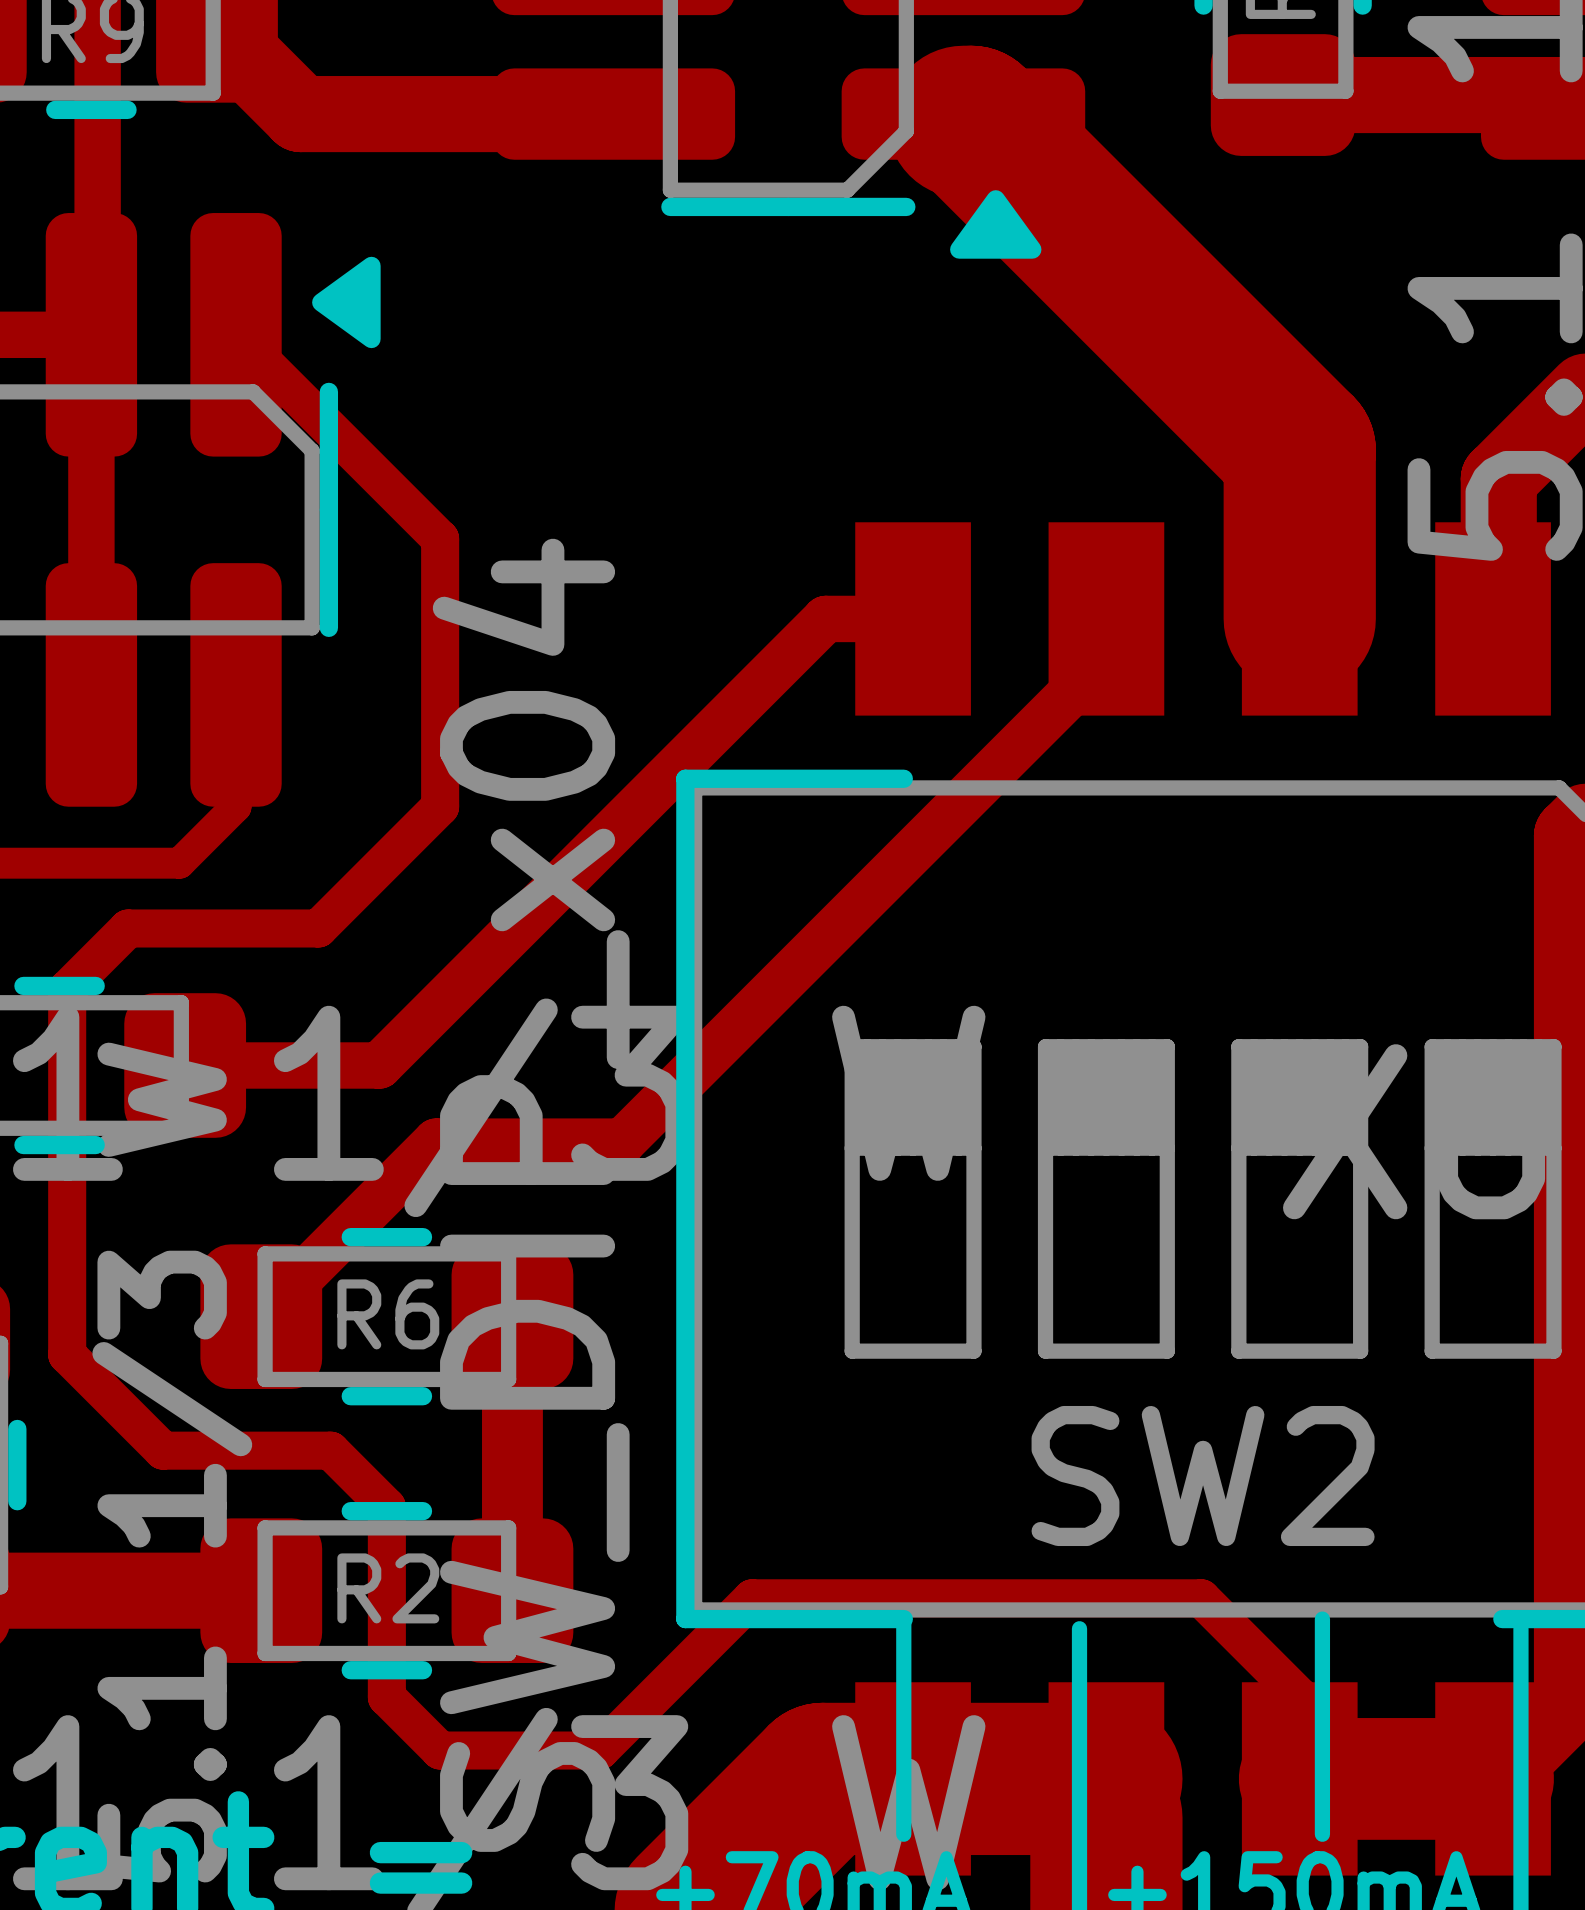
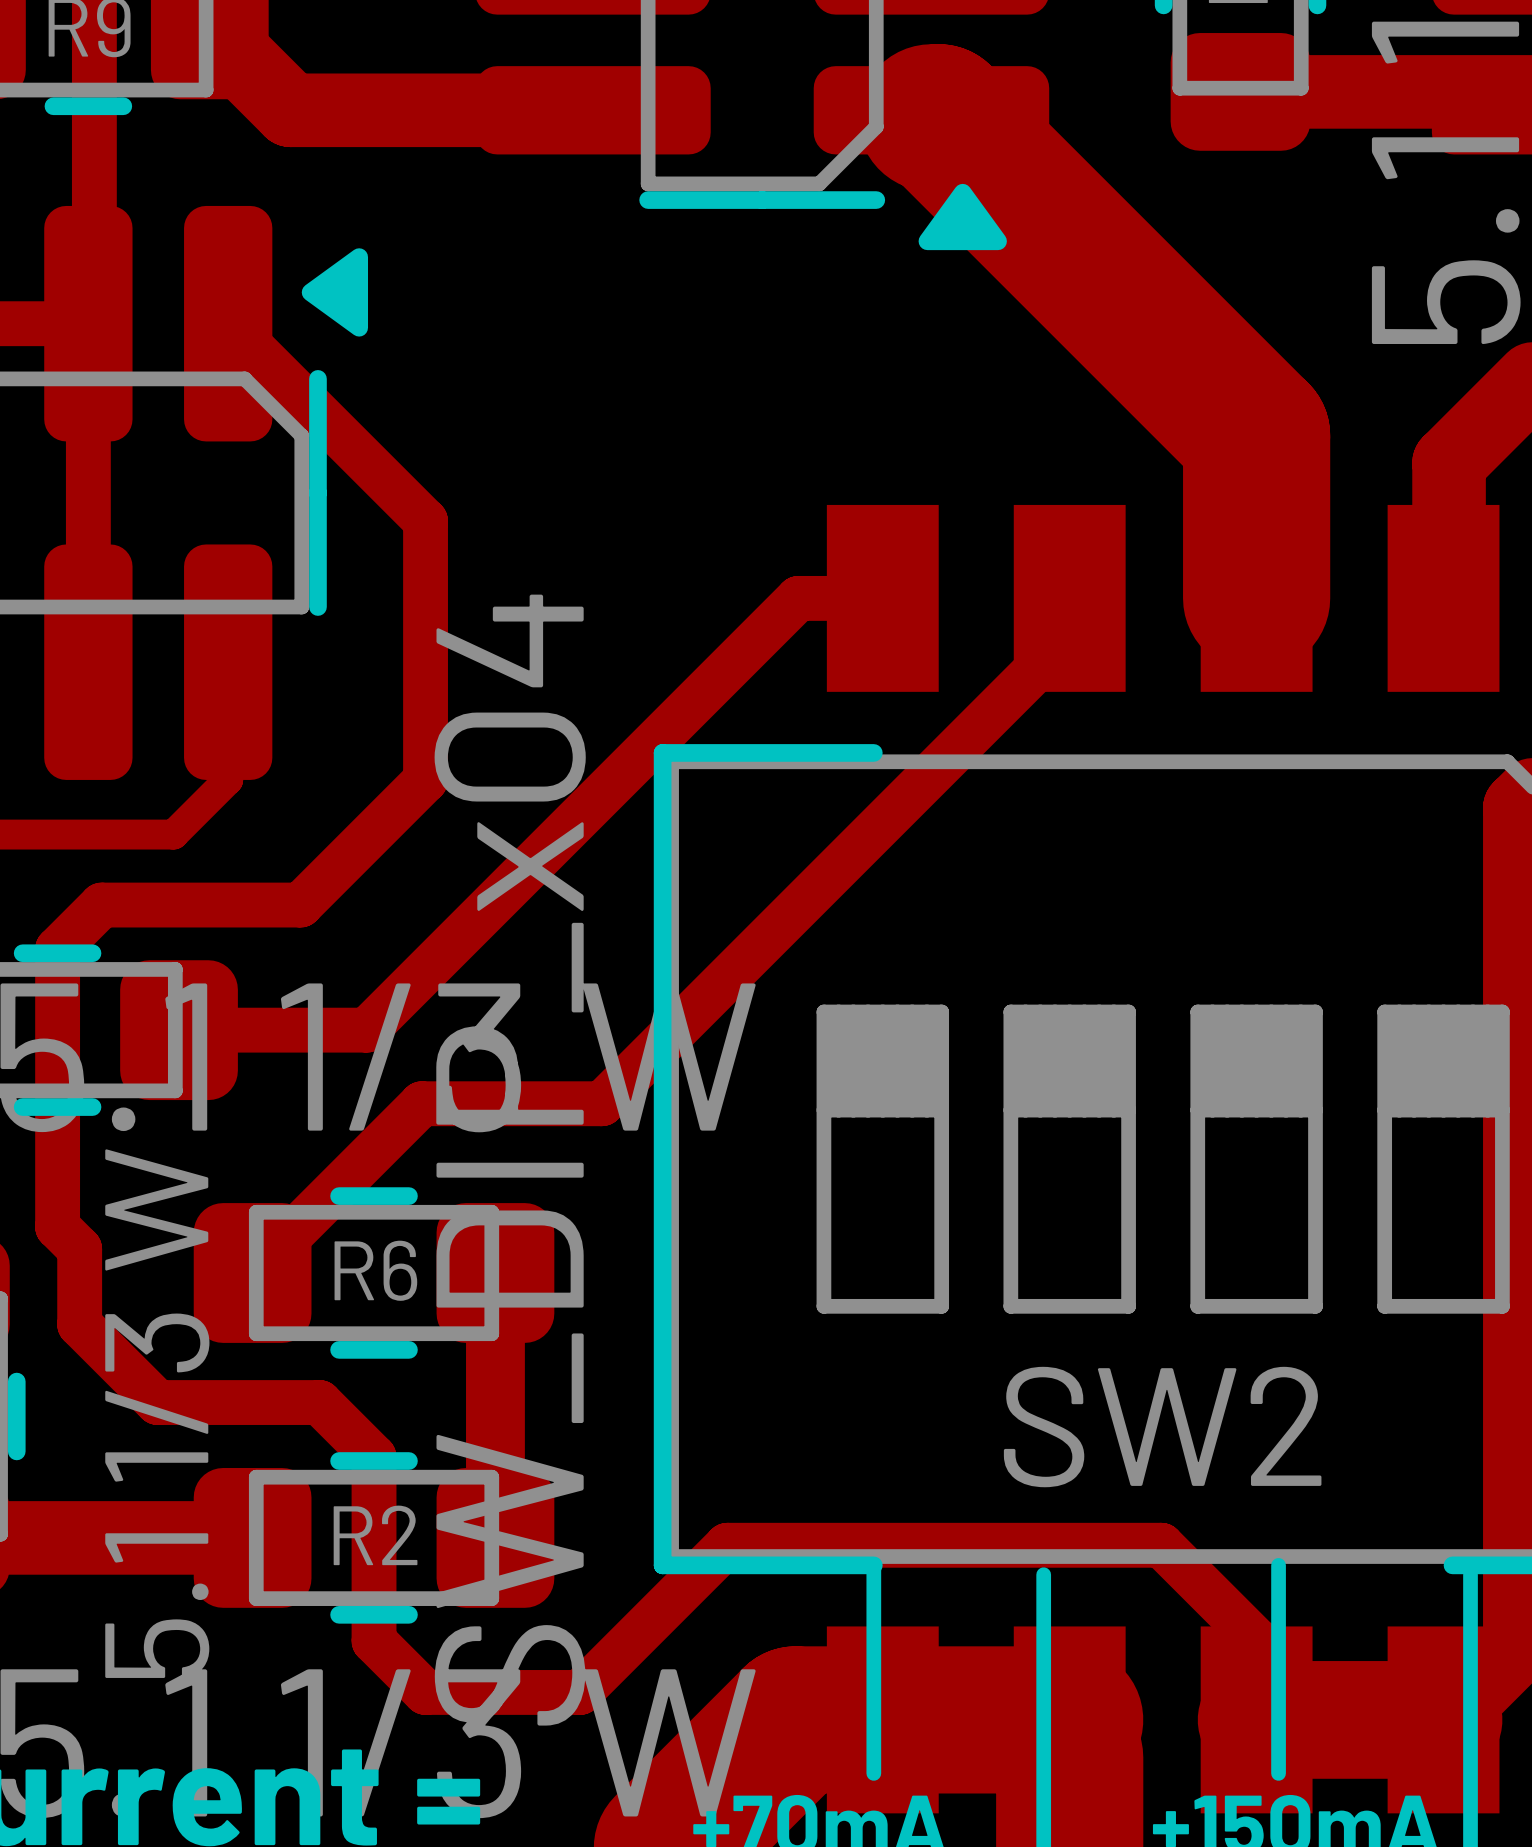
top track width: thin (236, 334) (440, 538) (440, 806) (318, 928) -> thick (228, 323) (425, 521) (425, 779) (307, 897)
top track: (318, 928) (128, 928) (67, 989) (67, 1354) (82, 1369) -> (307, 897) (300, 905) (101, 905) (57, 949) (57, 1226) (79, 1248) (79, 1324)
top track width: thin (82, 1369) (163, 1450) (330, 1450) (386, 1506) (386, 1697) (440, 1750) (599, 1750) (752, 1598) (1201, 1598) (1299, 1696) (1299, 1778) -> thick (79, 1324) (157, 1402) (319, 1402) (374, 1456) (374, 1640) (425, 1692) (580, 1692) (727, 1545) (1161, 1545) (1256, 1640) (1256, 1719)

